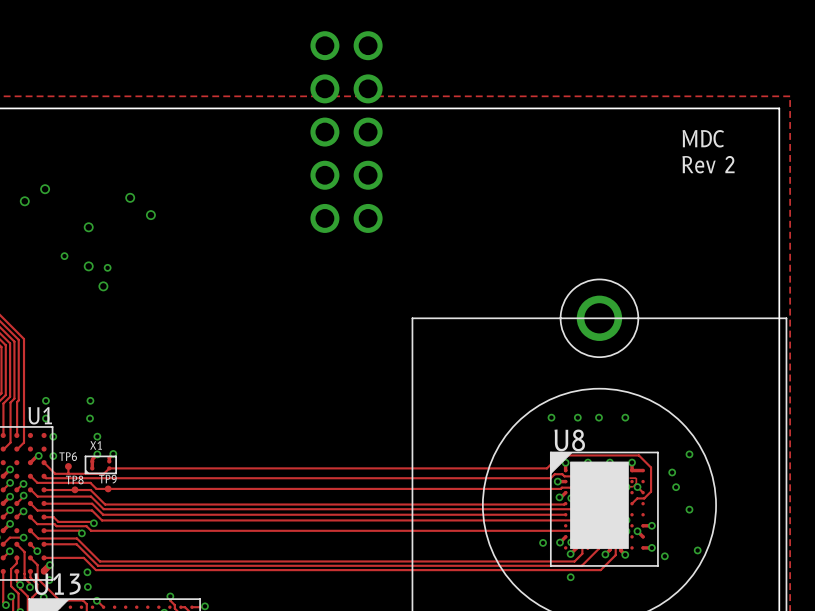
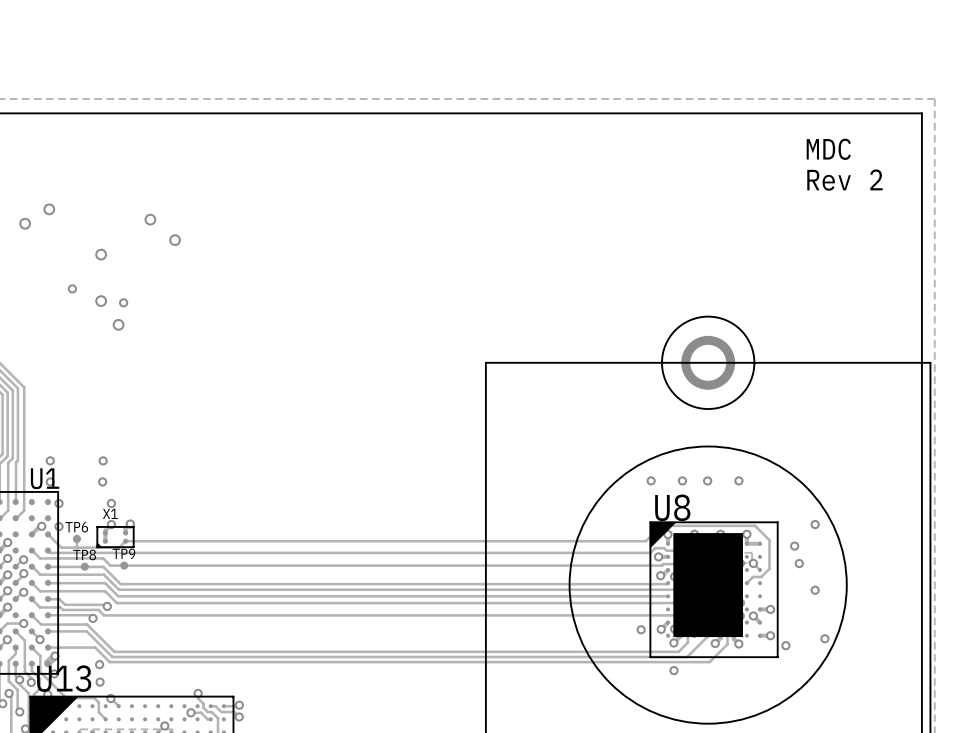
part: (346, 132) -> none

